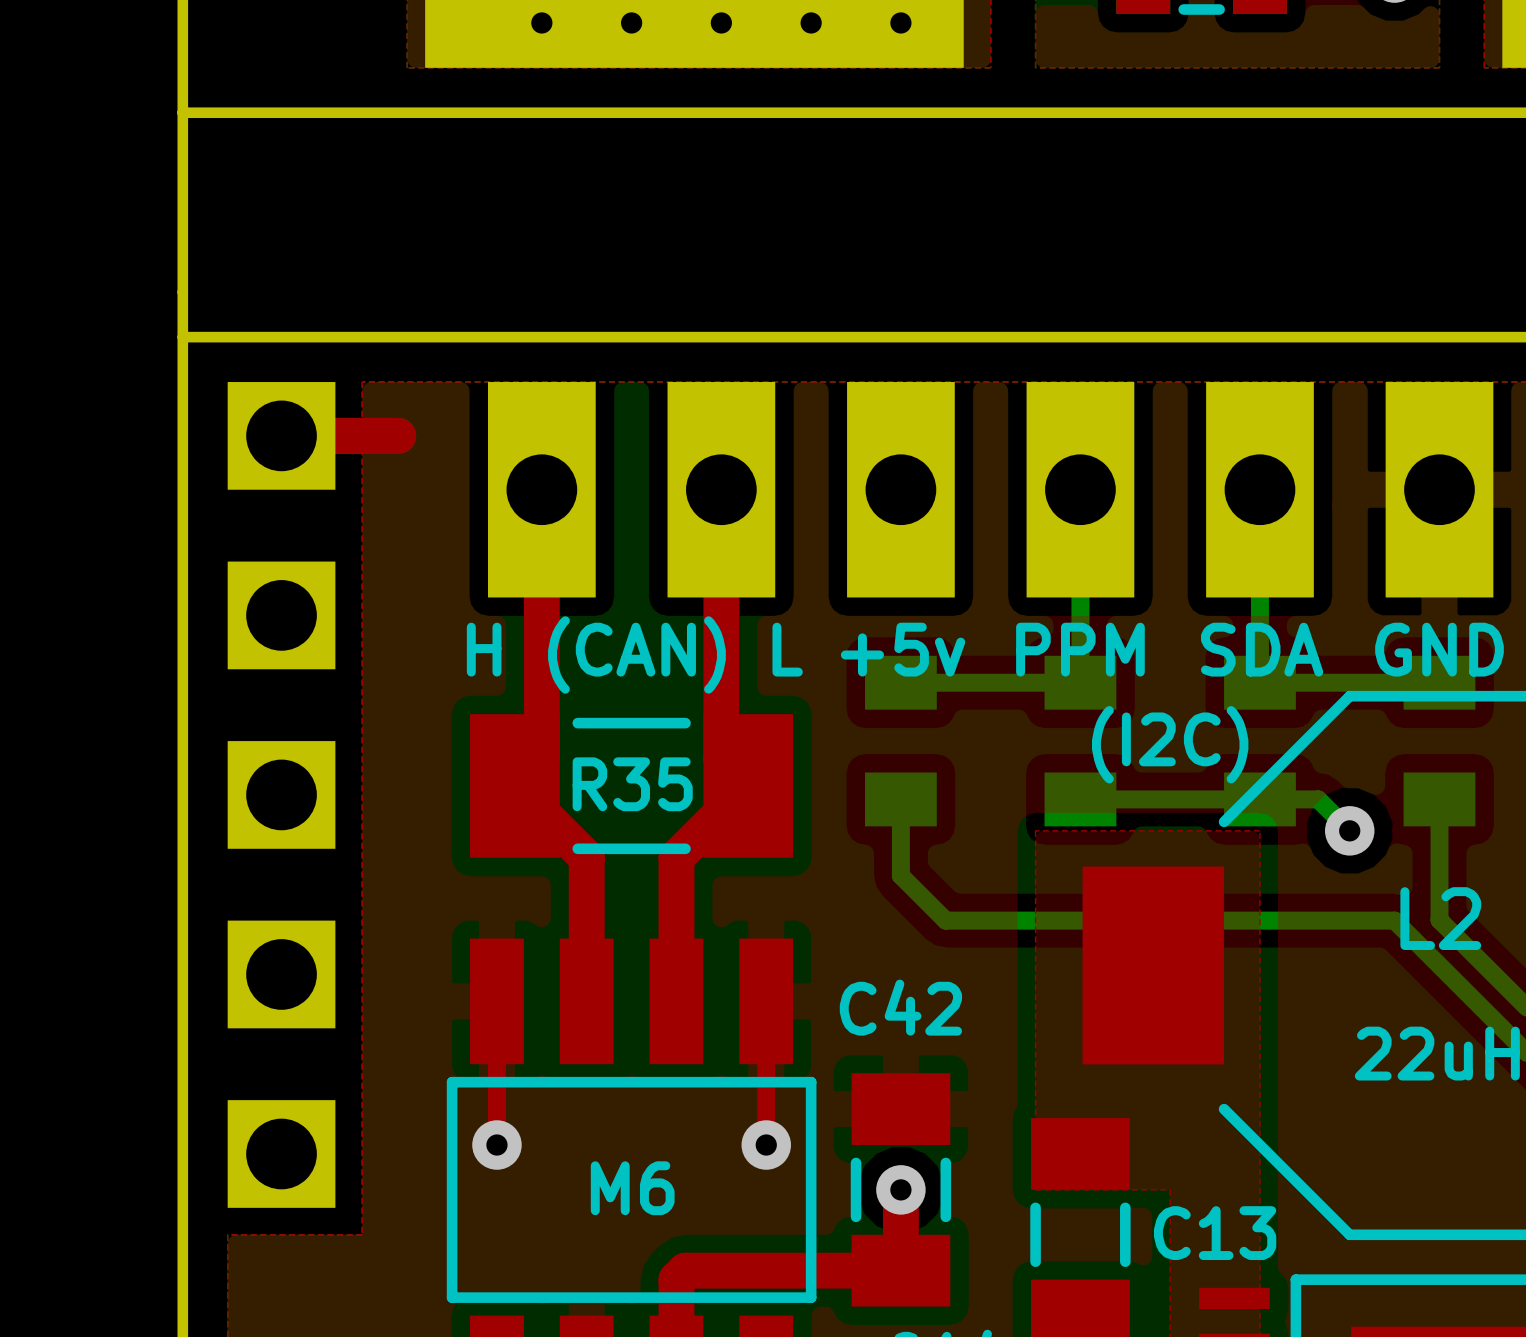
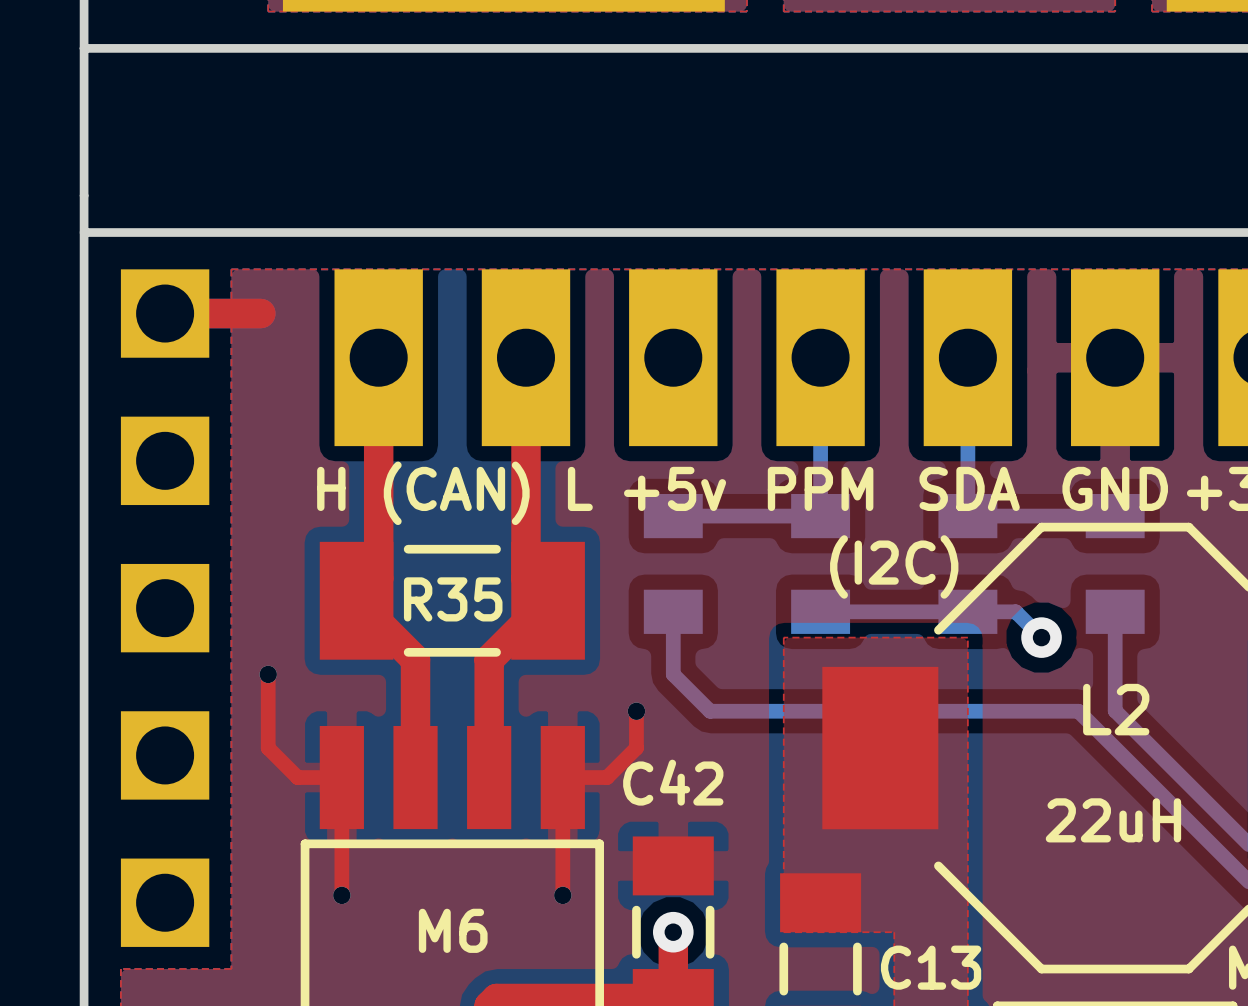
top track: none -> (268, 674) (268, 748) (297, 777) (341, 777)
via: none -> (268, 674)
top track: none -> (636, 711) (636, 748) (607, 777) (562, 777)
via: none -> (636, 711)
via size: [472, 1120, 522, 1170] -> [333, 886, 351, 905]
via size: [741, 1120, 792, 1170] -> [554, 886, 572, 905]

